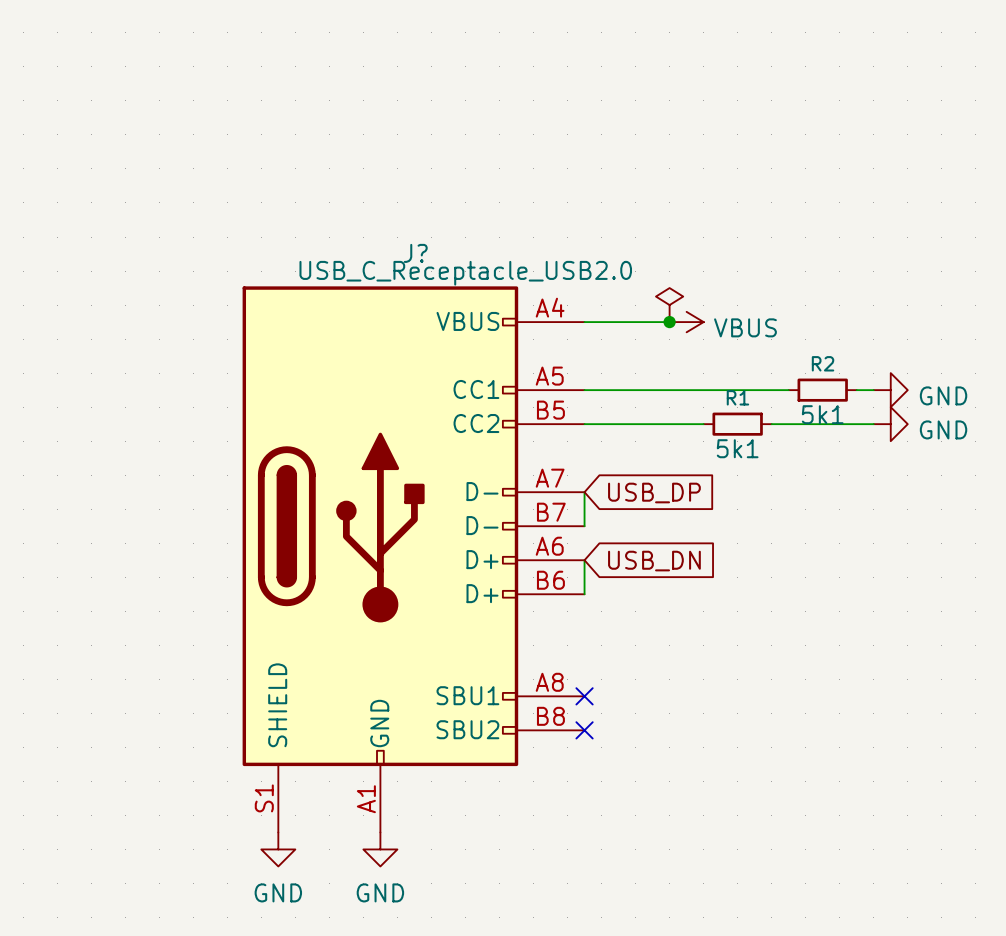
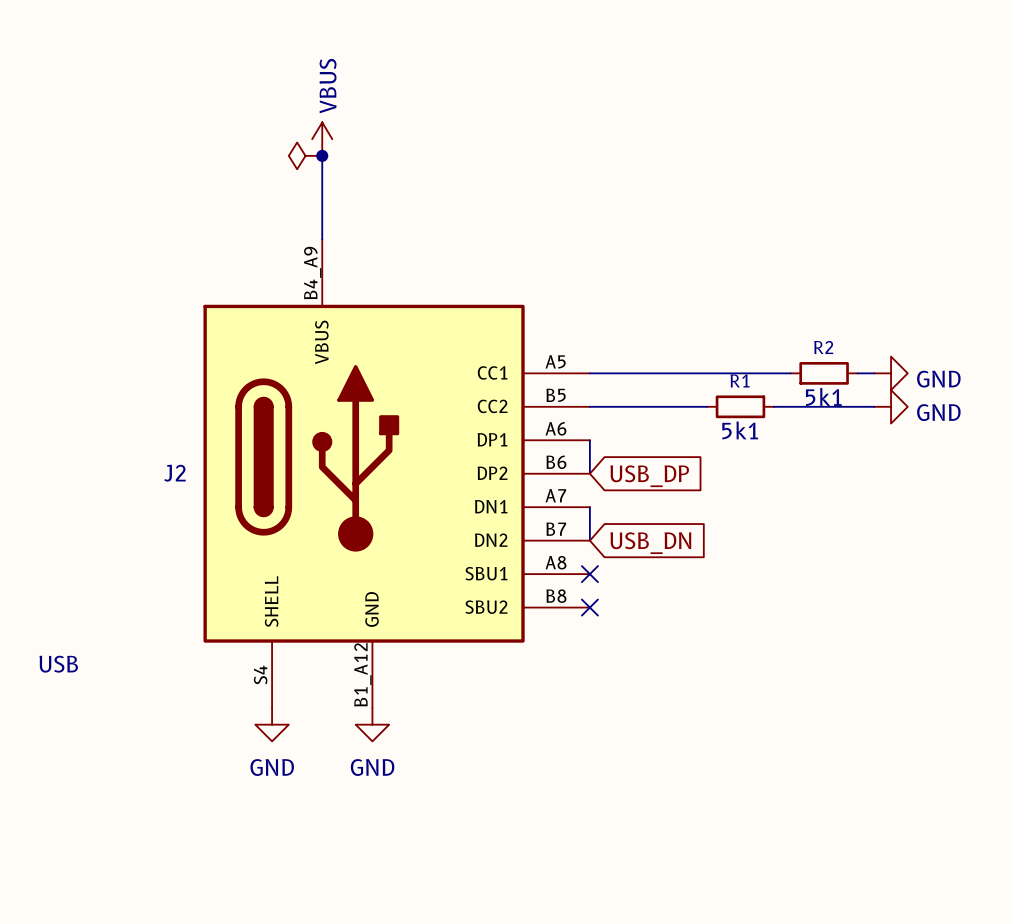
power symbol: none -> VBUS (322, 139)
power symbol: none -> (305, 155)
wire: none -> (322, 155) (322, 239)
junction: none -> (322, 155)
power symbol: (669, 305) -> none
wire: (584, 322) (669, 322) -> none
junction: (669, 322) -> none
power symbol: VBUS (686, 322) -> none
J2: none -> USB (396, 473)
wire: (584, 492) (584, 526) -> (589, 473) (589, 440)
J?: USB_C_Receptacle_USB2.0 (413, 559) -> none
wire: (584, 560) (584, 594) -> (589, 540) (589, 507)
no-connect mark: none -> (589, 574)
no-connect mark: none -> (589, 607)
no-connect mark: (584, 696) -> none
no-connect mark: (584, 730) -> none
power symbol: none -> GND (272, 724)
power symbol: none -> GND (372, 724)
power symbol: GND (278, 849) -> none
power symbol: GND (380, 849) -> none

